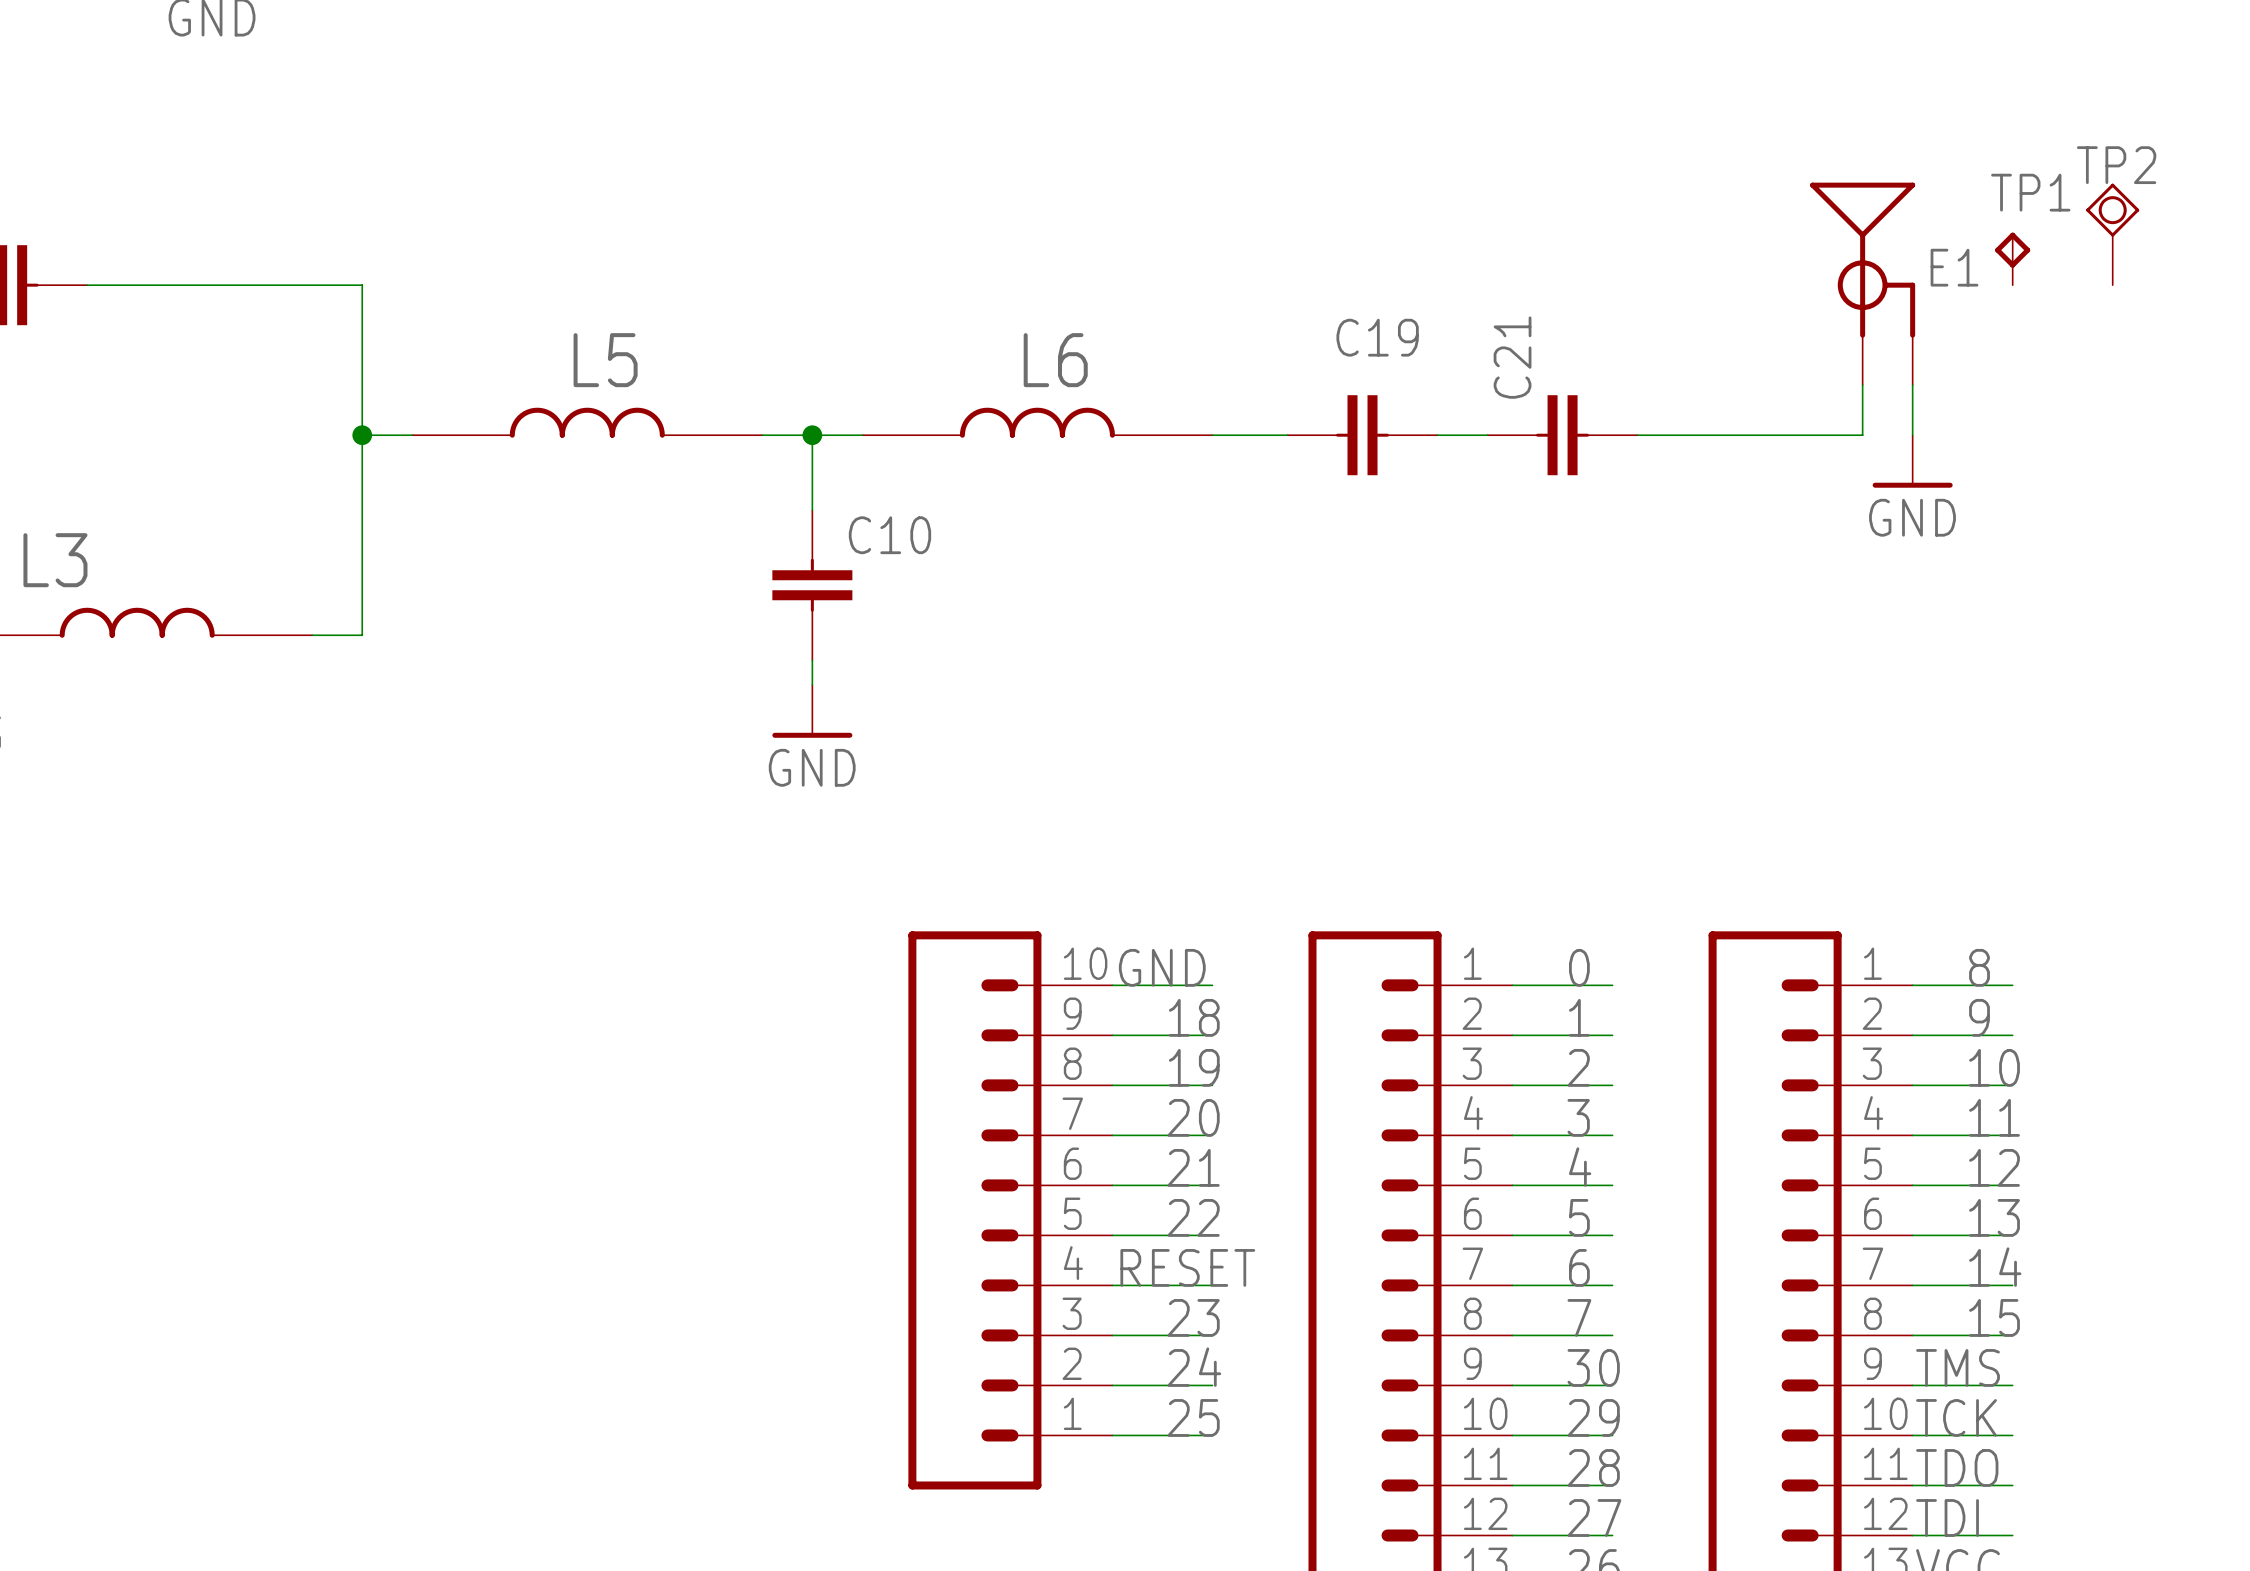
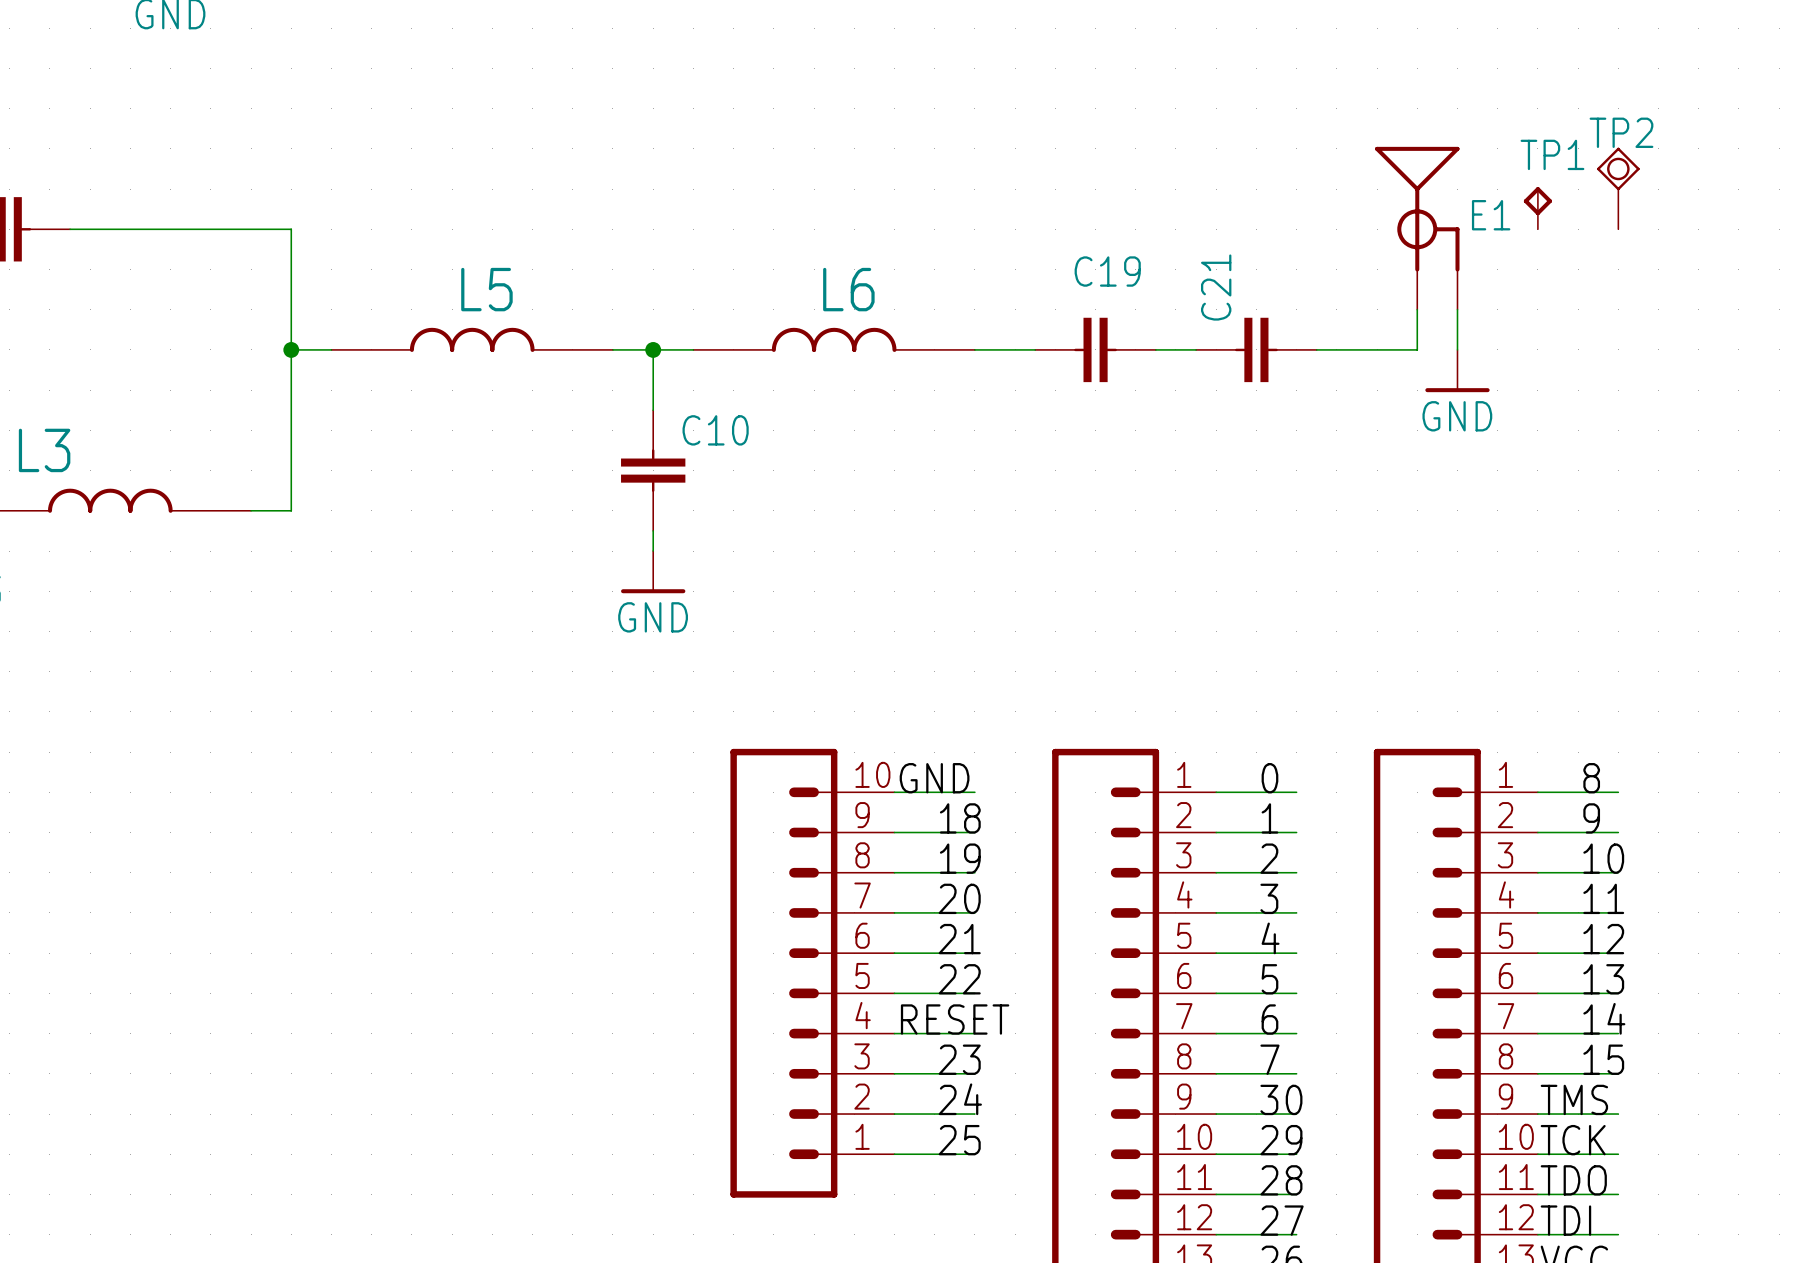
TP2 position: (2112, 234) -> (1618, 188)
TP1 position: (2012, 258) -> (1537, 208)
E1 position: (1862, 283) -> (1417, 228)
wire: (1862, 385) (1862, 435) (1762, 435) -> (1417, 309) (1417, 349)
wire: (1912, 385) (1912, 435) -> (1457, 309) (1457, 349)
power symbol position: GND (1912, 461) -> GND (1457, 371)

